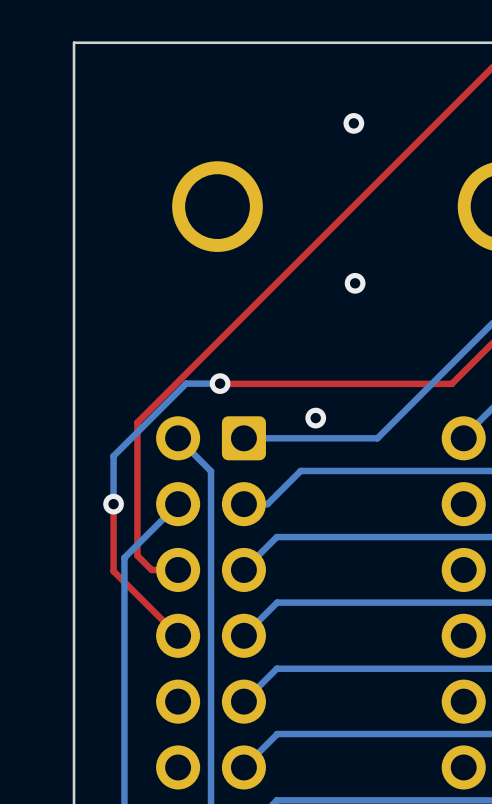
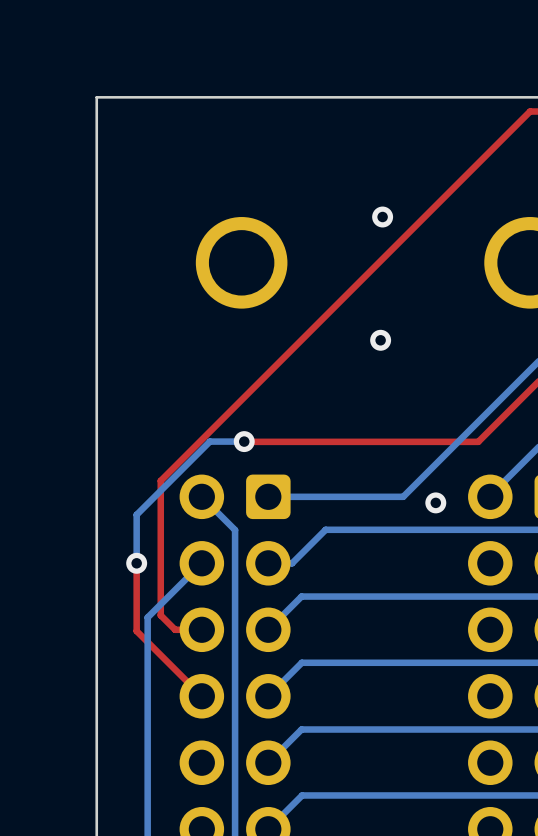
via position: (353, 123) -> (382, 217)
via position: (315, 418) -> (435, 502)

